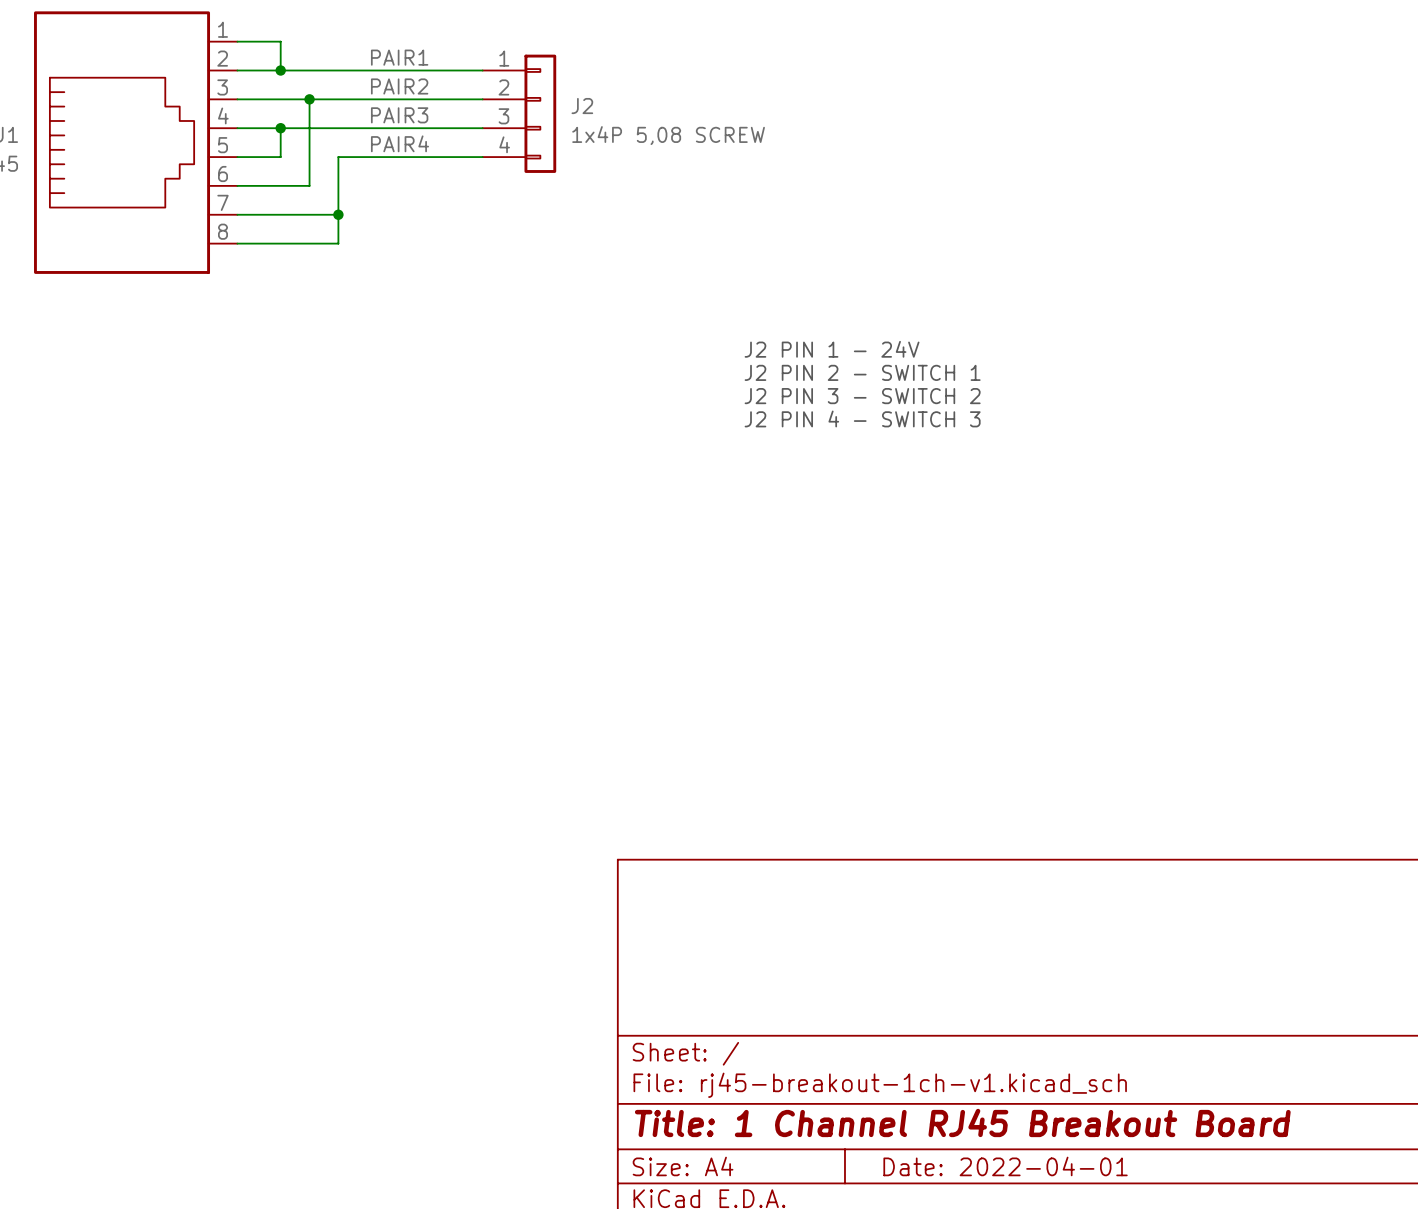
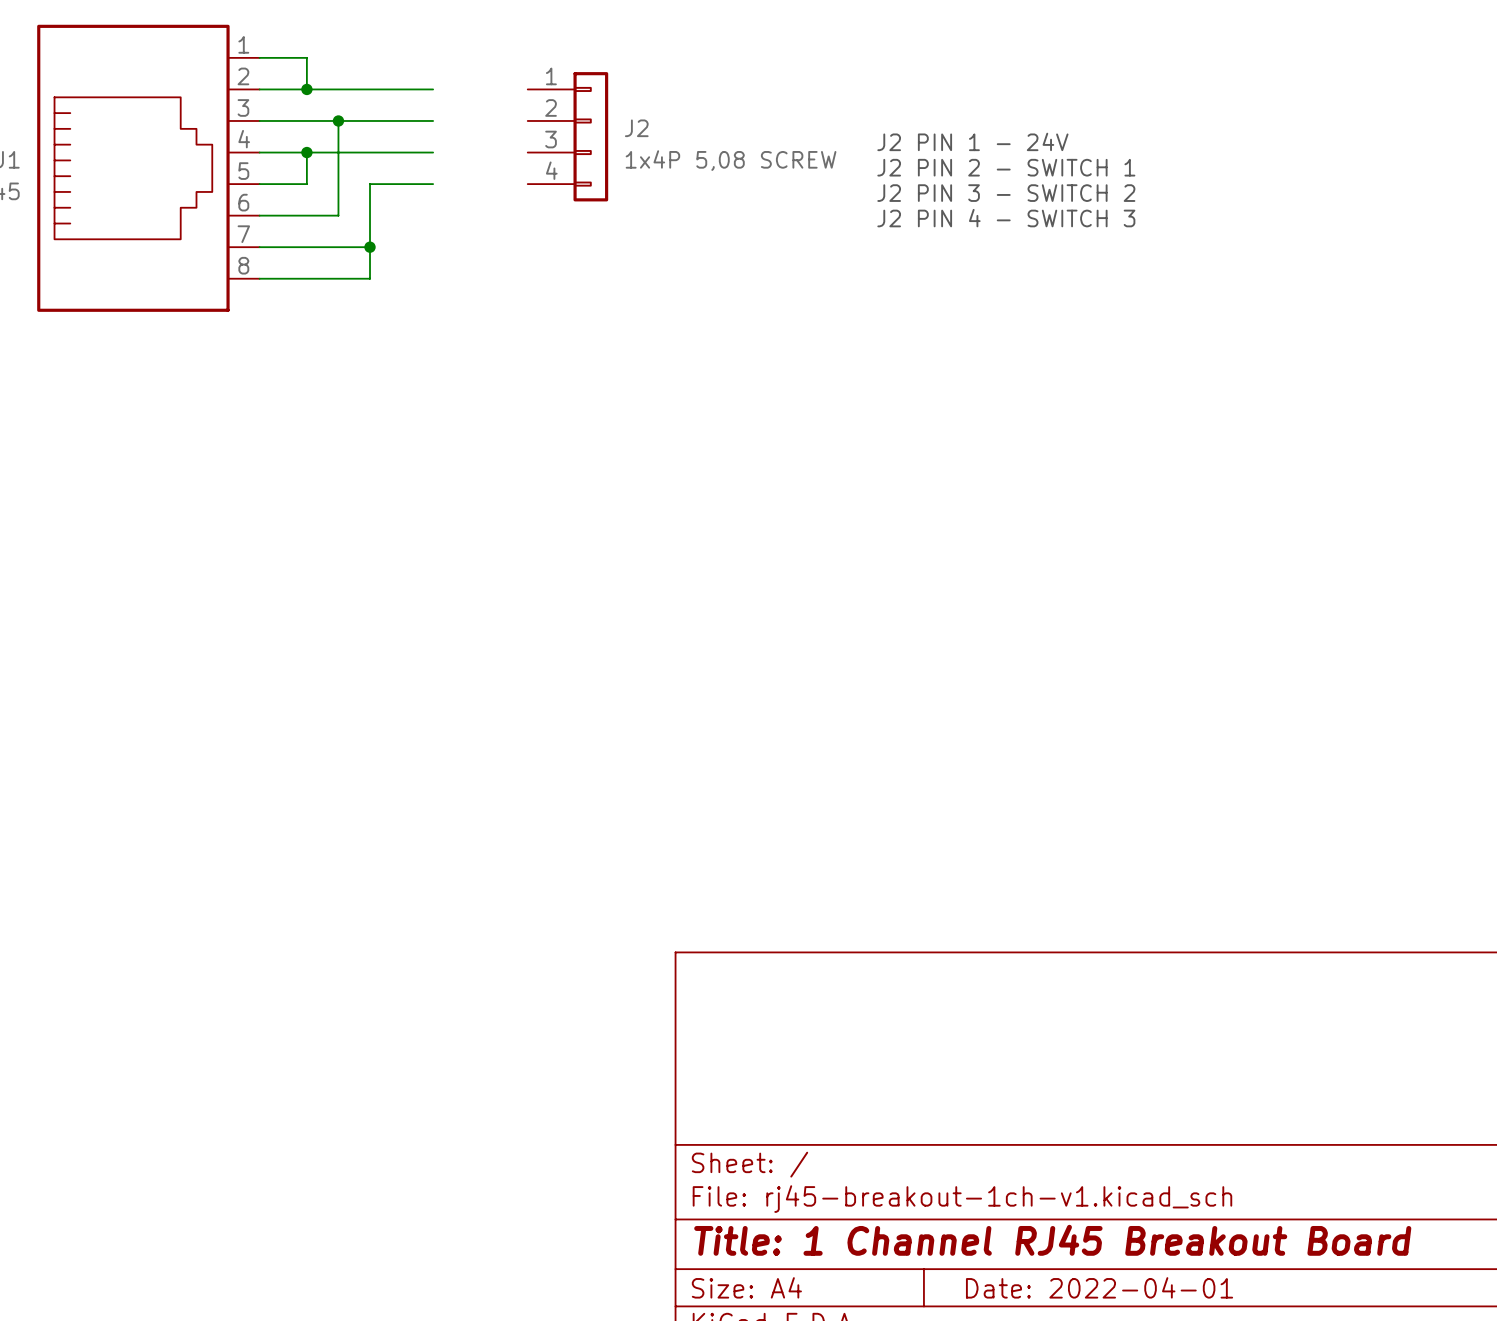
label: PAIR1 (399, 57) -> none
wire: (396, 70) (482, 70) -> none
label: PAIR2 (399, 86) -> none
wire: (396, 99) (482, 99) -> none
label: PAIR3 (399, 115) -> none
wire: (396, 128) (482, 128) -> none
label: PAIR4 (399, 143) -> none
wire: (396, 157) (482, 157) -> none
text position: J2 PIN 1 - 24V (832, 349) -> J2 PIN 1 - 24V (972, 141)
text position: J2 PIN 2 - SWITCH 1 (862, 372) -> J2 PIN 2 - SWITCH 1 (1006, 167)
text position: J2 PIN 3 - SWITCH 2 (862, 396) -> J2 PIN 3 - SWITCH 2 (1006, 193)
text position: J2 PIN 4 - SWITCH 3 (862, 418) -> J2 PIN 4 - SWITCH 3 (1006, 218)

